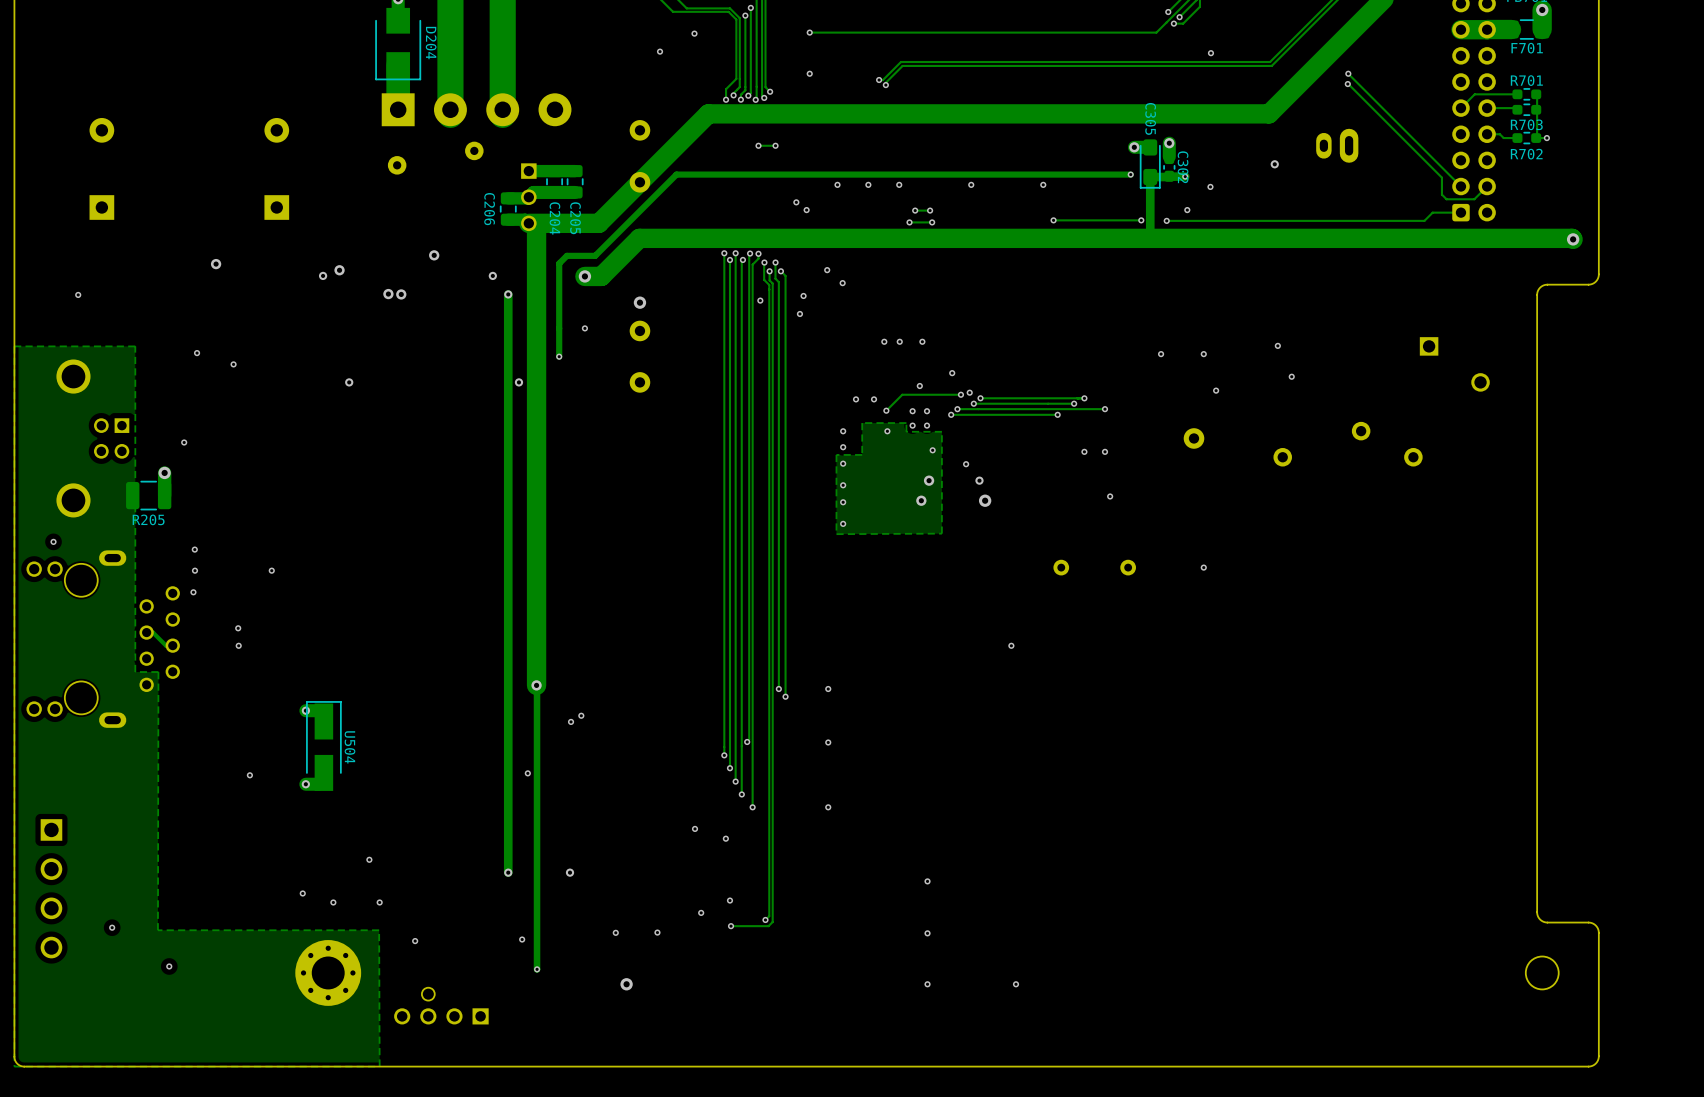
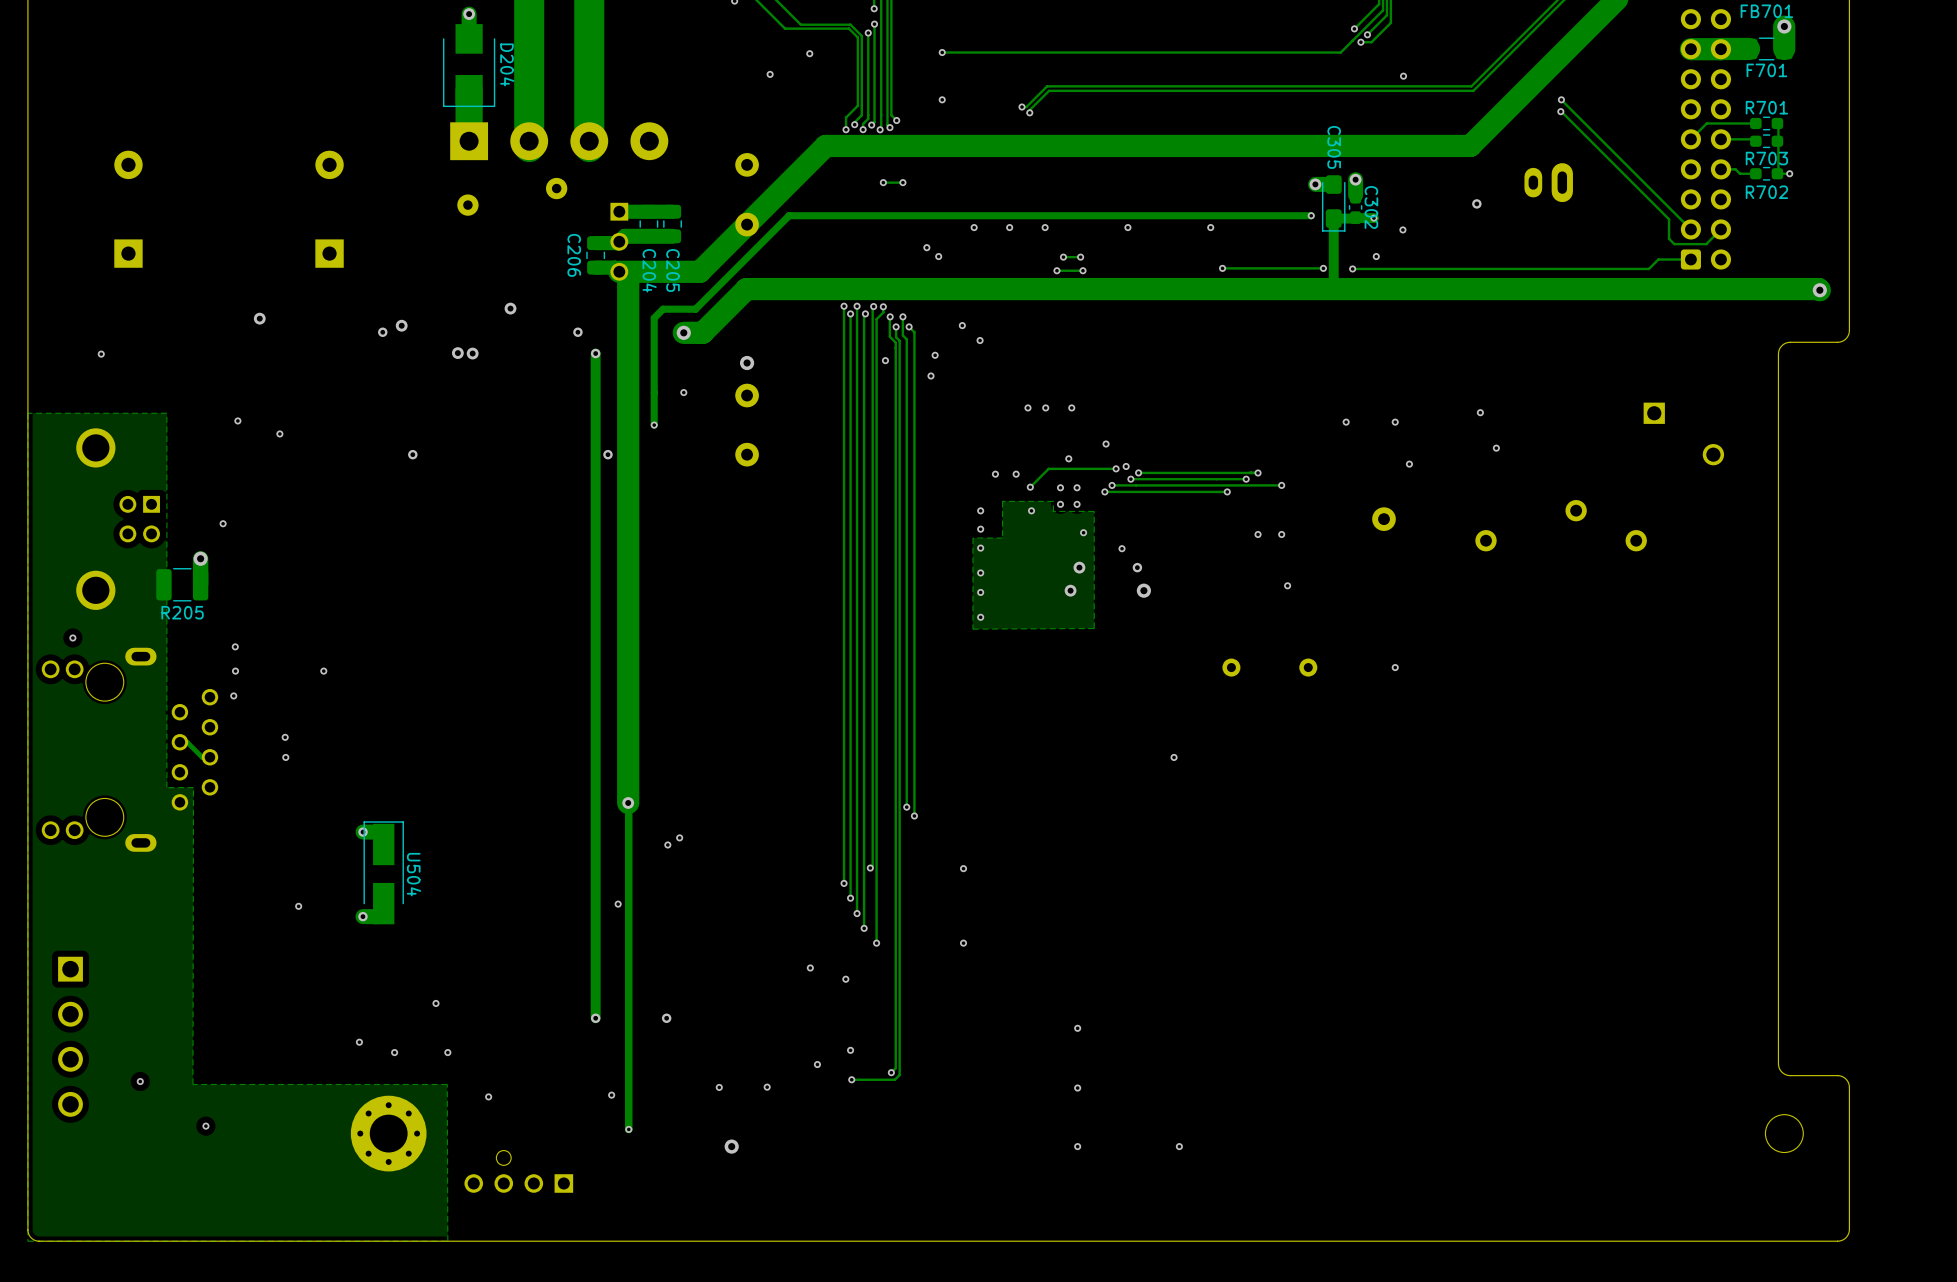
via: (828, 689) -> none

